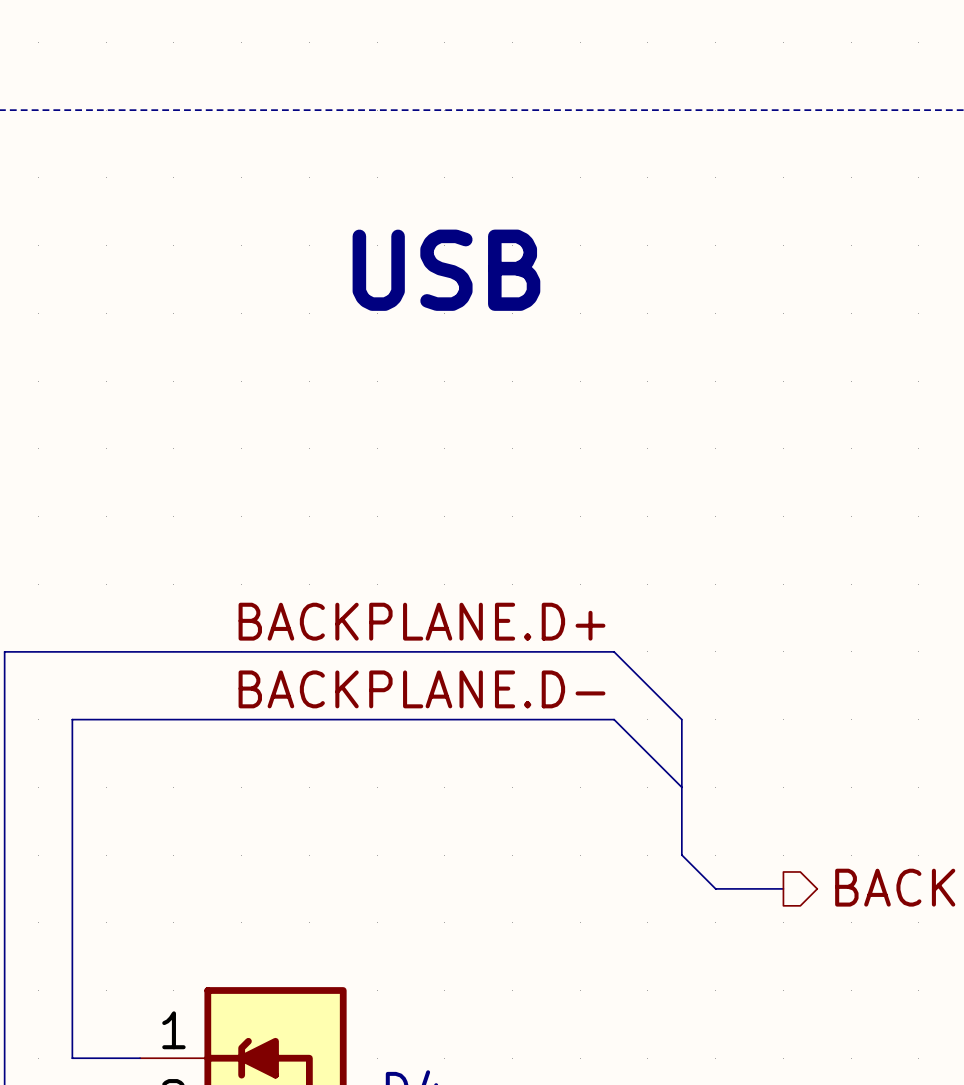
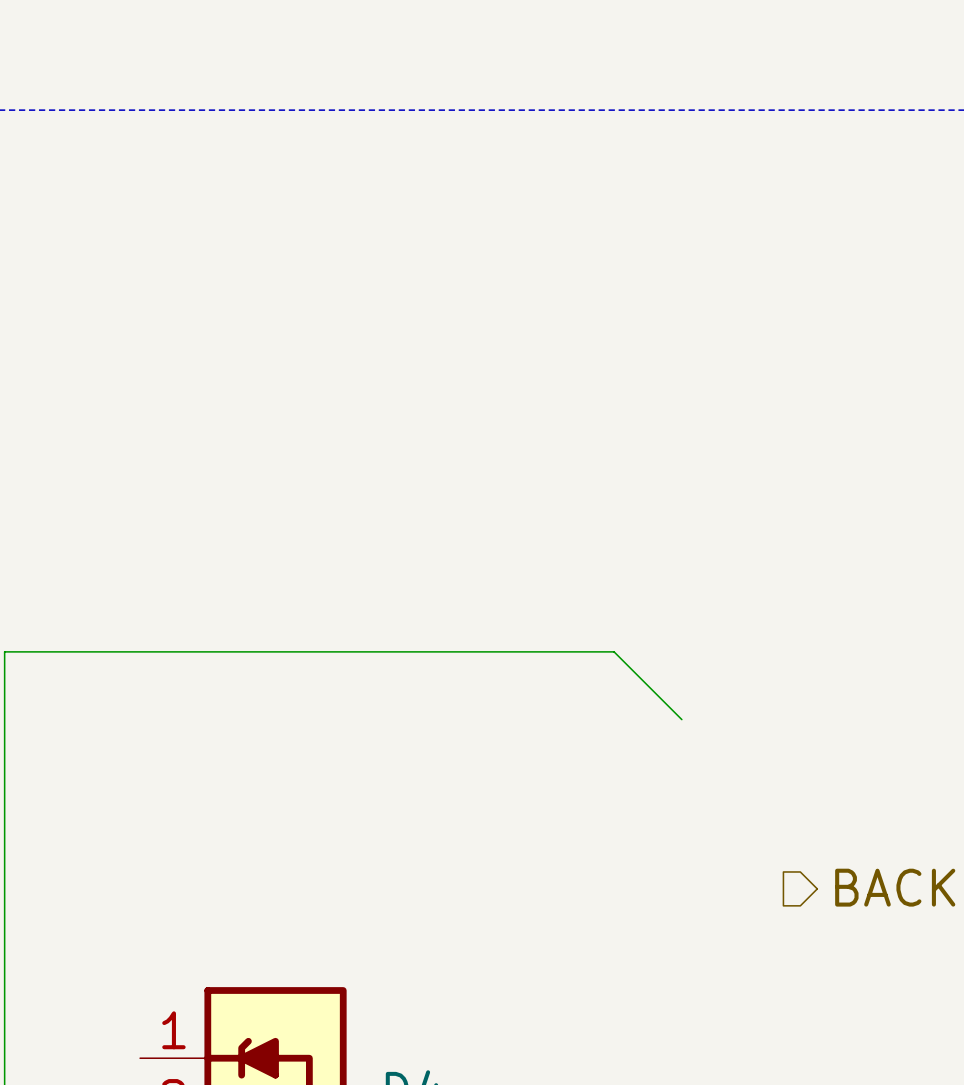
text: USB (446, 270) -> none
label: BACKPLANE.D+ (422, 621) -> none
label: BACKPLANE.D- (422, 689) -> none
bus: (681, 719) (681, 855) (715, 888) (783, 888) -> none
wire: (681, 787) (614, 719) (72, 719) (72, 1058) (140, 1058) -> none

